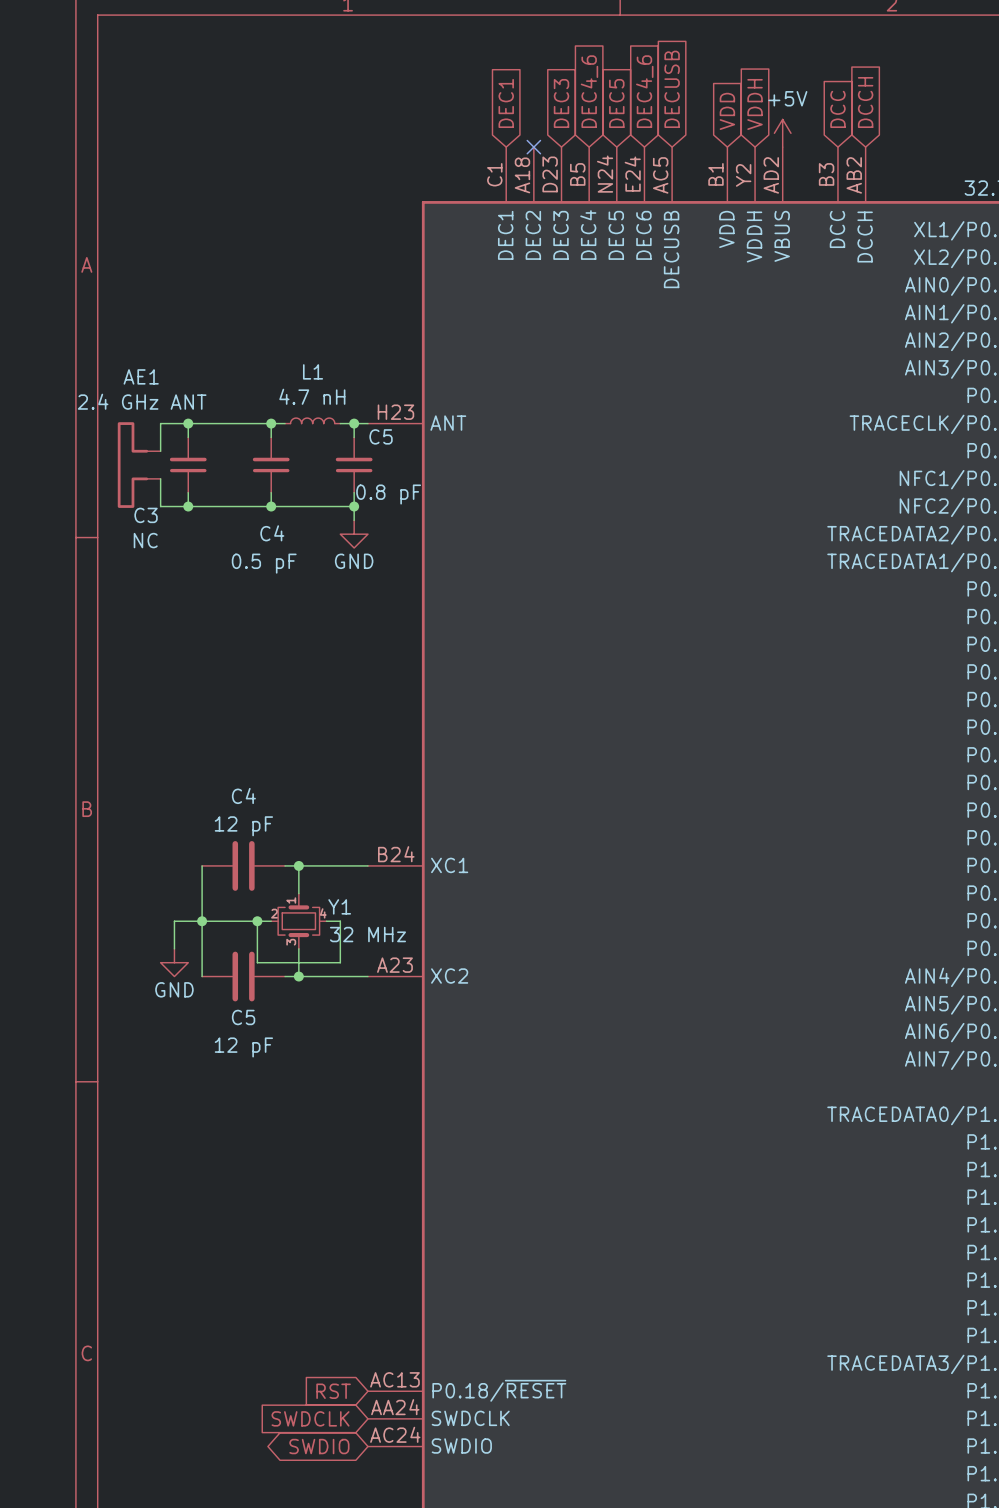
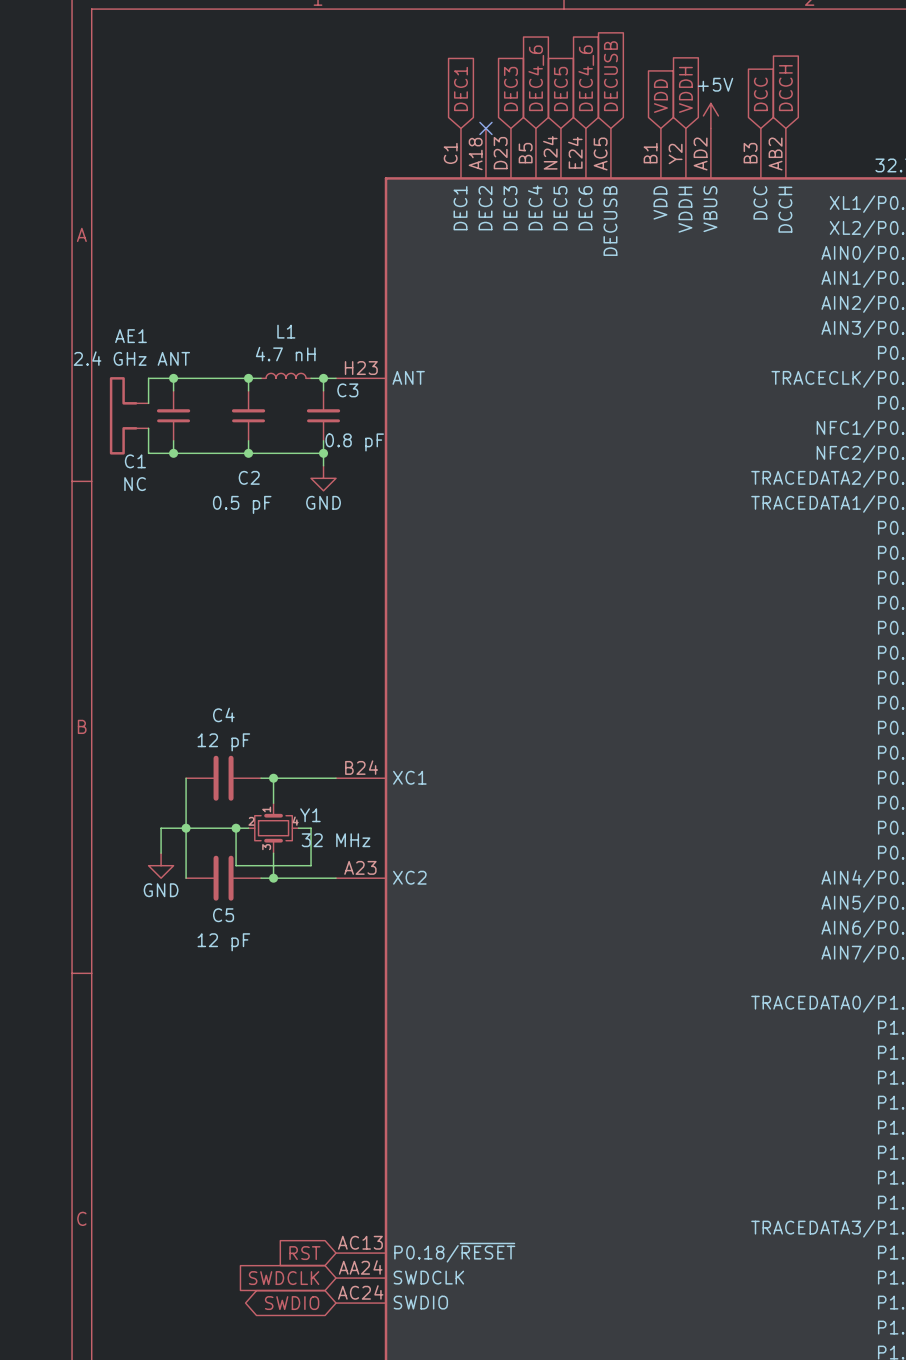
C5 name: C5 (381, 436) -> C3 (347, 390)
C3 name: C3 (146, 515) -> C1 (135, 461)
C4 name: C4 (272, 533) -> C2 (249, 477)

